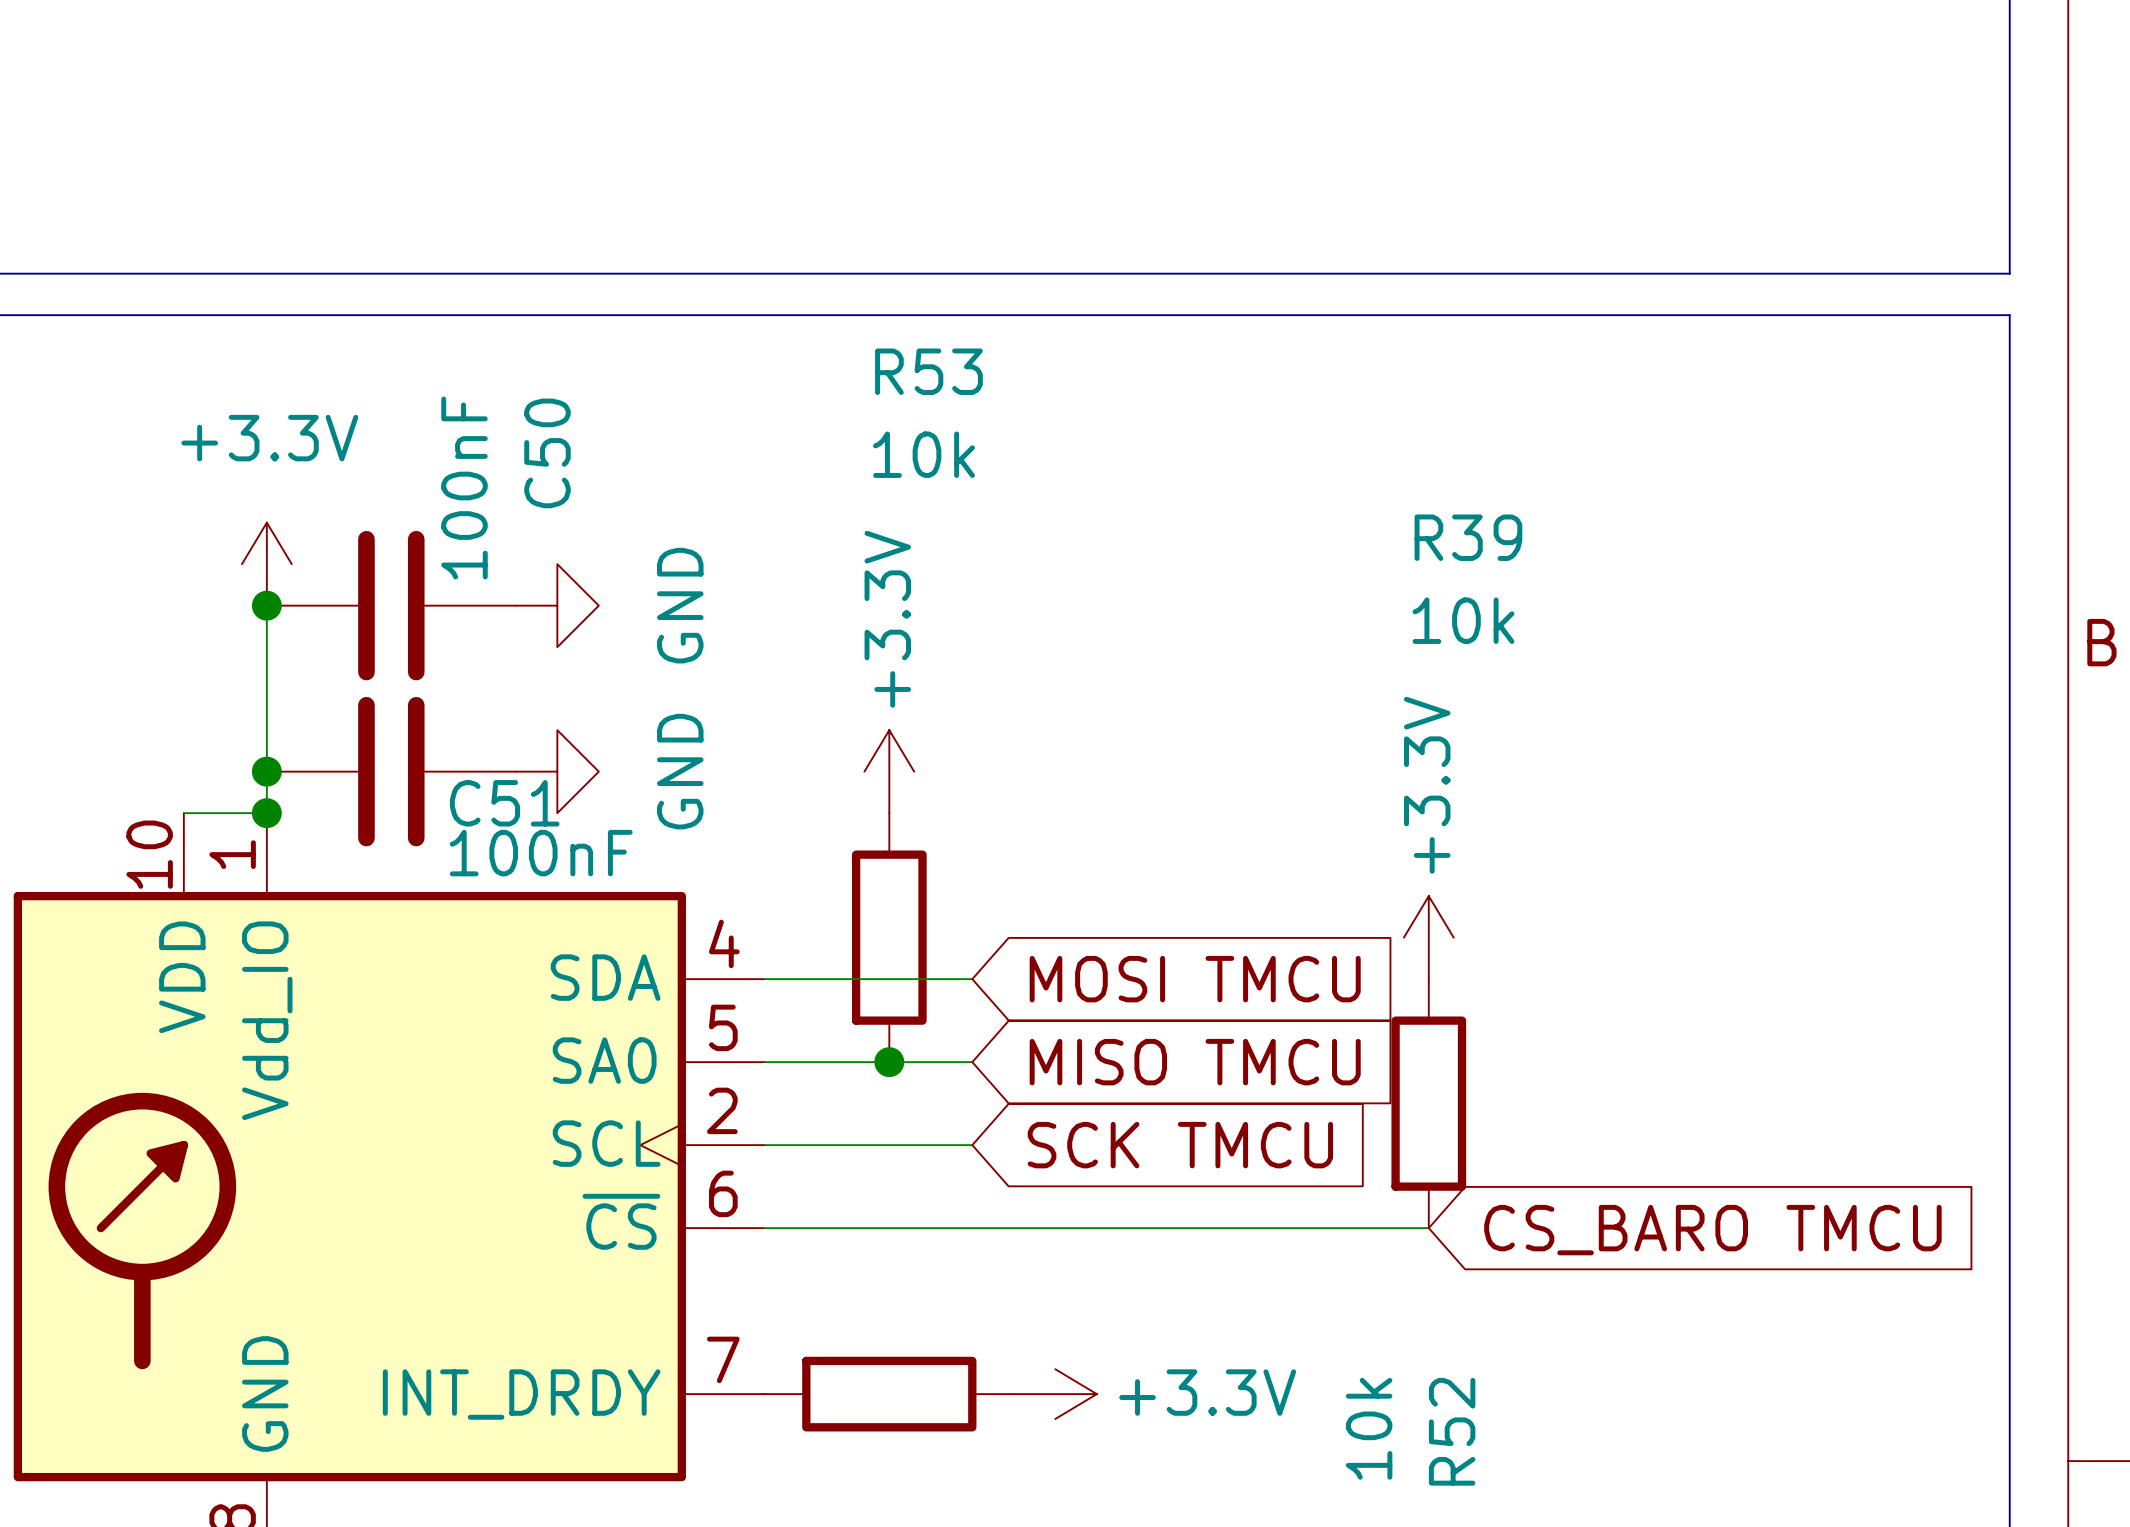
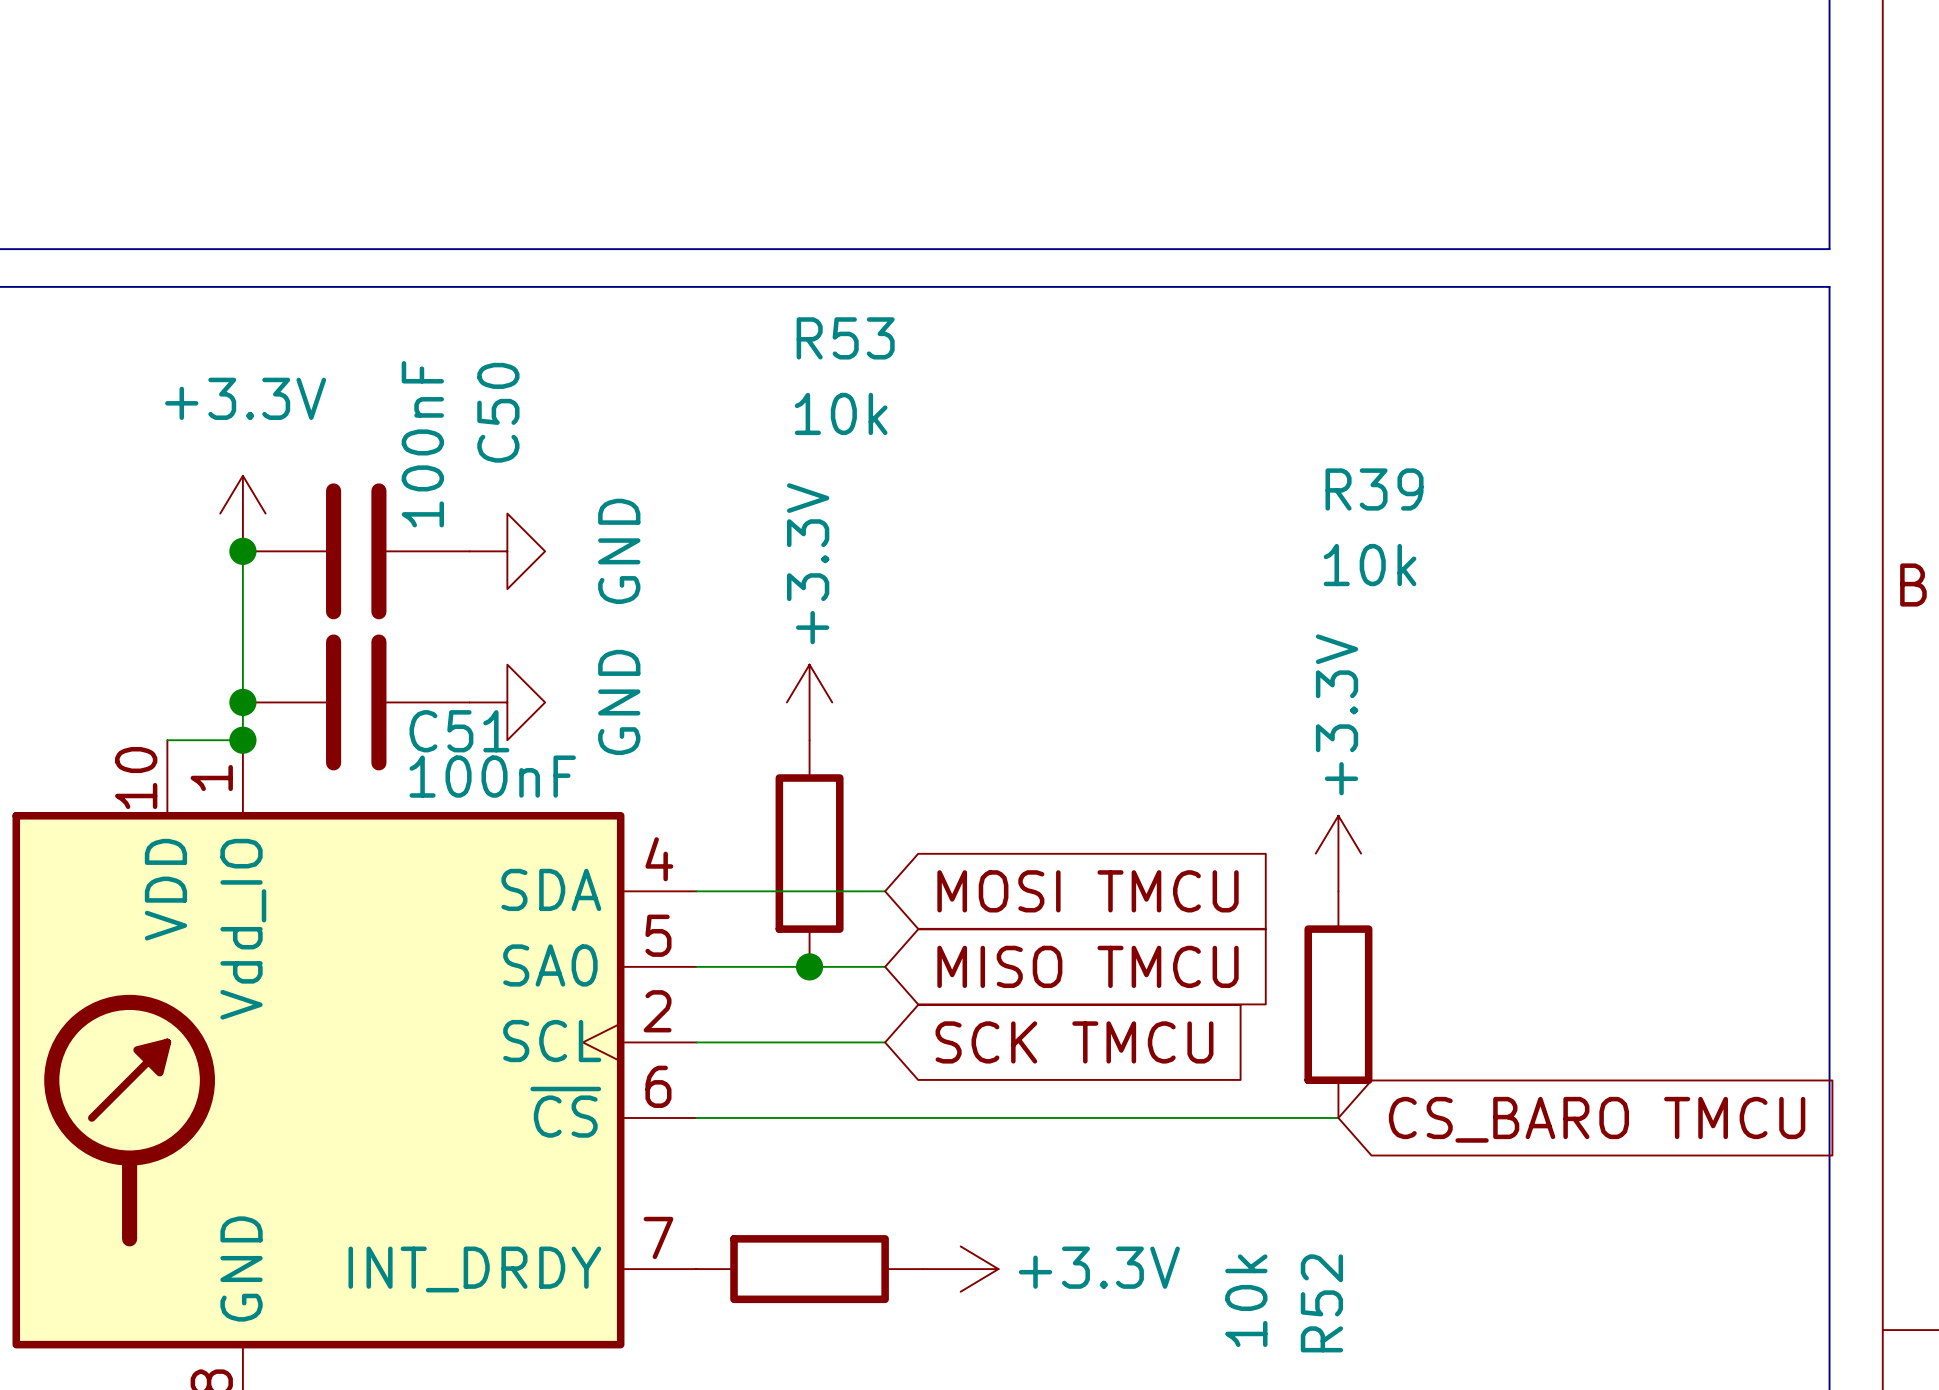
power symbol position: +3.3V (1428, 937) -> +3.3V (1338, 853)
R39 position: (1428, 1103) -> (1338, 1004)
wire: none -> (1300, 1117) (1338, 1117)
global label position: CS_BARO TMCU (1712, 1230) -> CS_BARO TMCU (1597, 1119)

